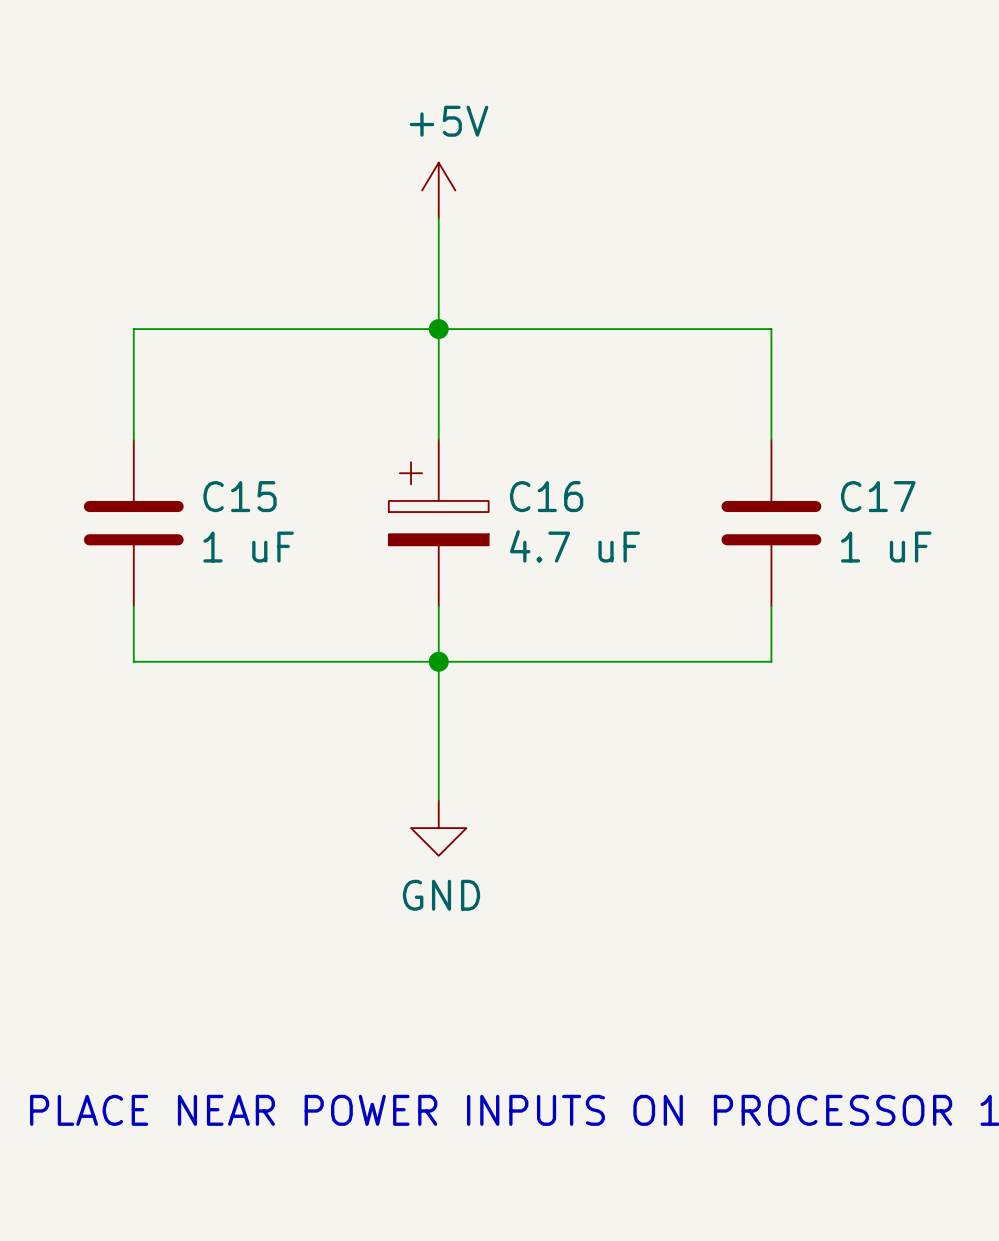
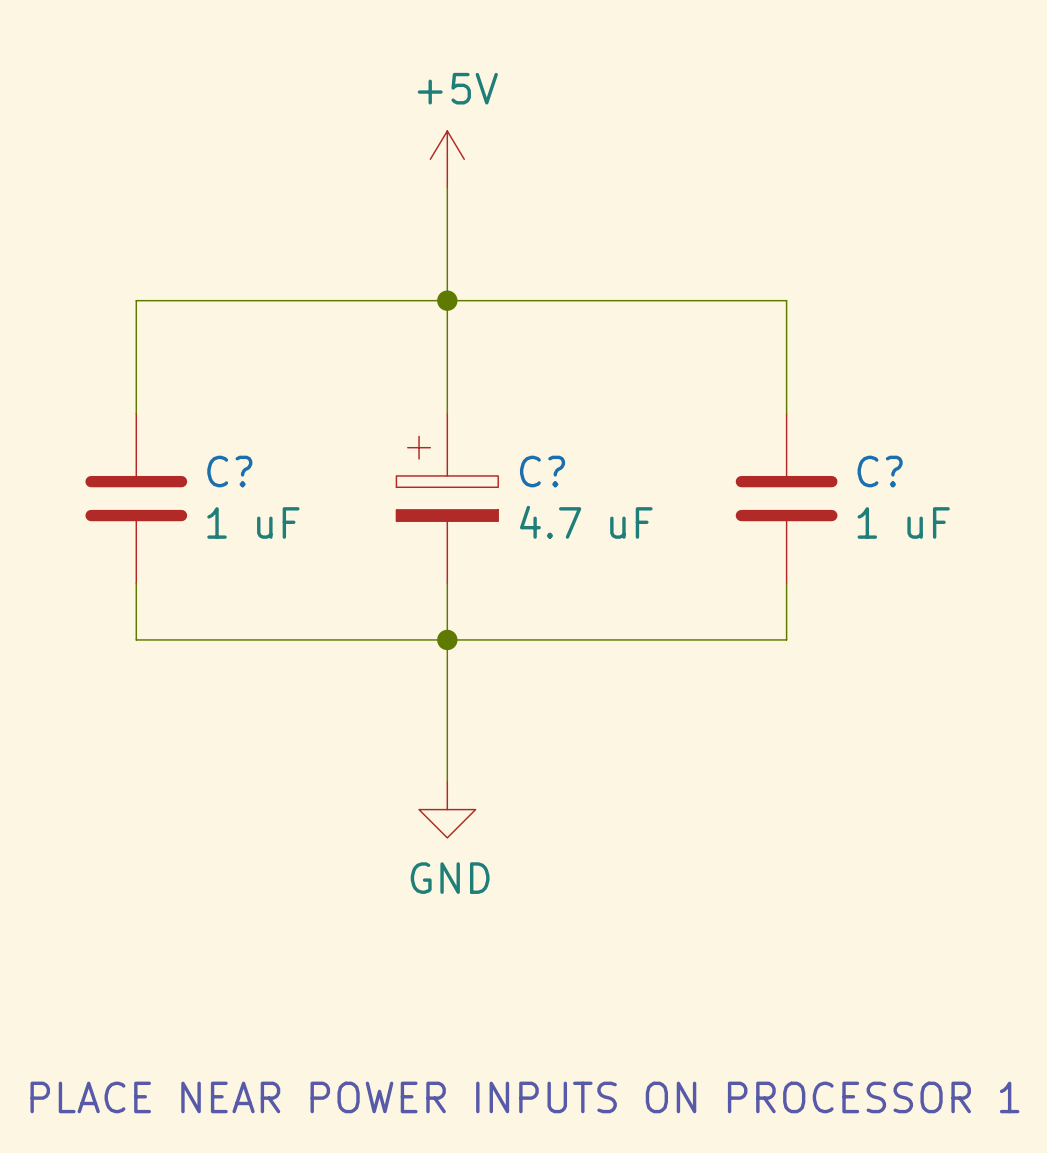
C15 name: C15 (240, 496) -> C? (229, 471)
C16 name: C16 (546, 496) -> C? (542, 471)
C17 name: C17 (878, 496) -> C? (880, 471)

